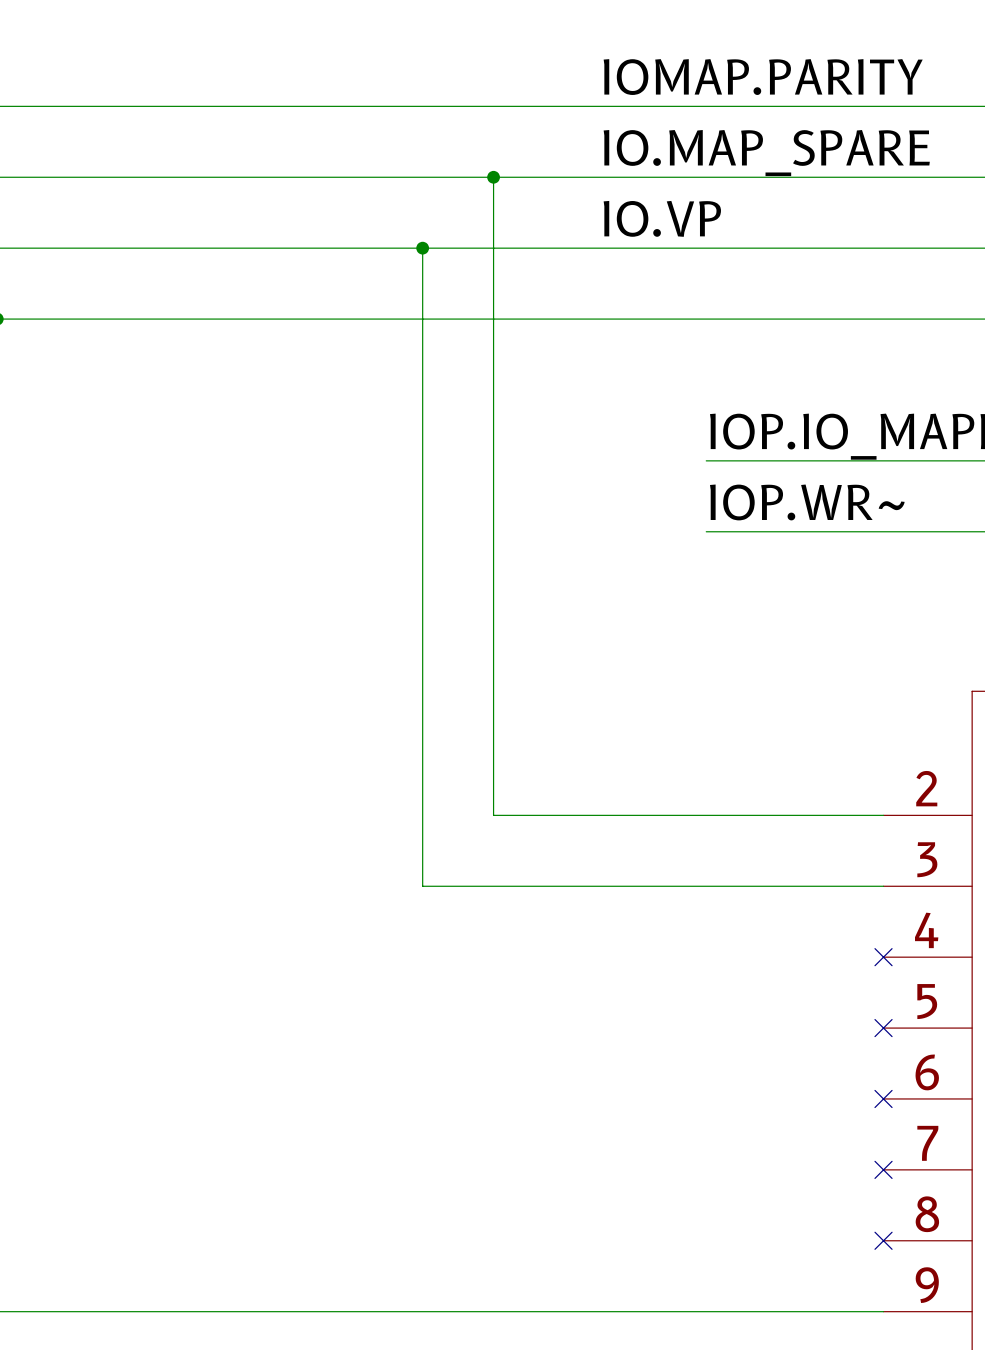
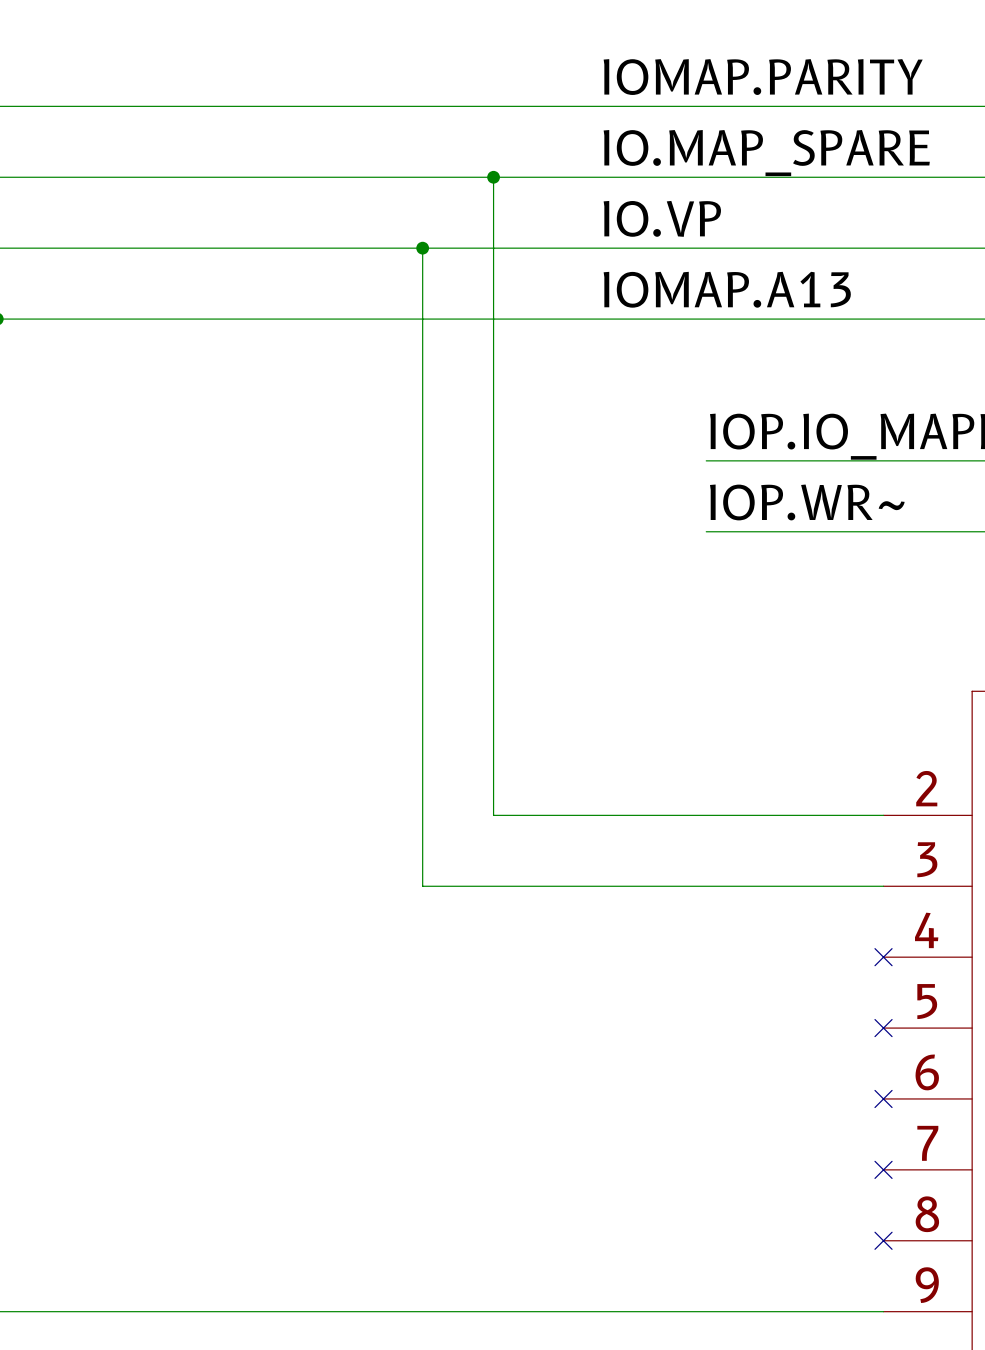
label: none -> IOMAP.A13 (727, 289)

